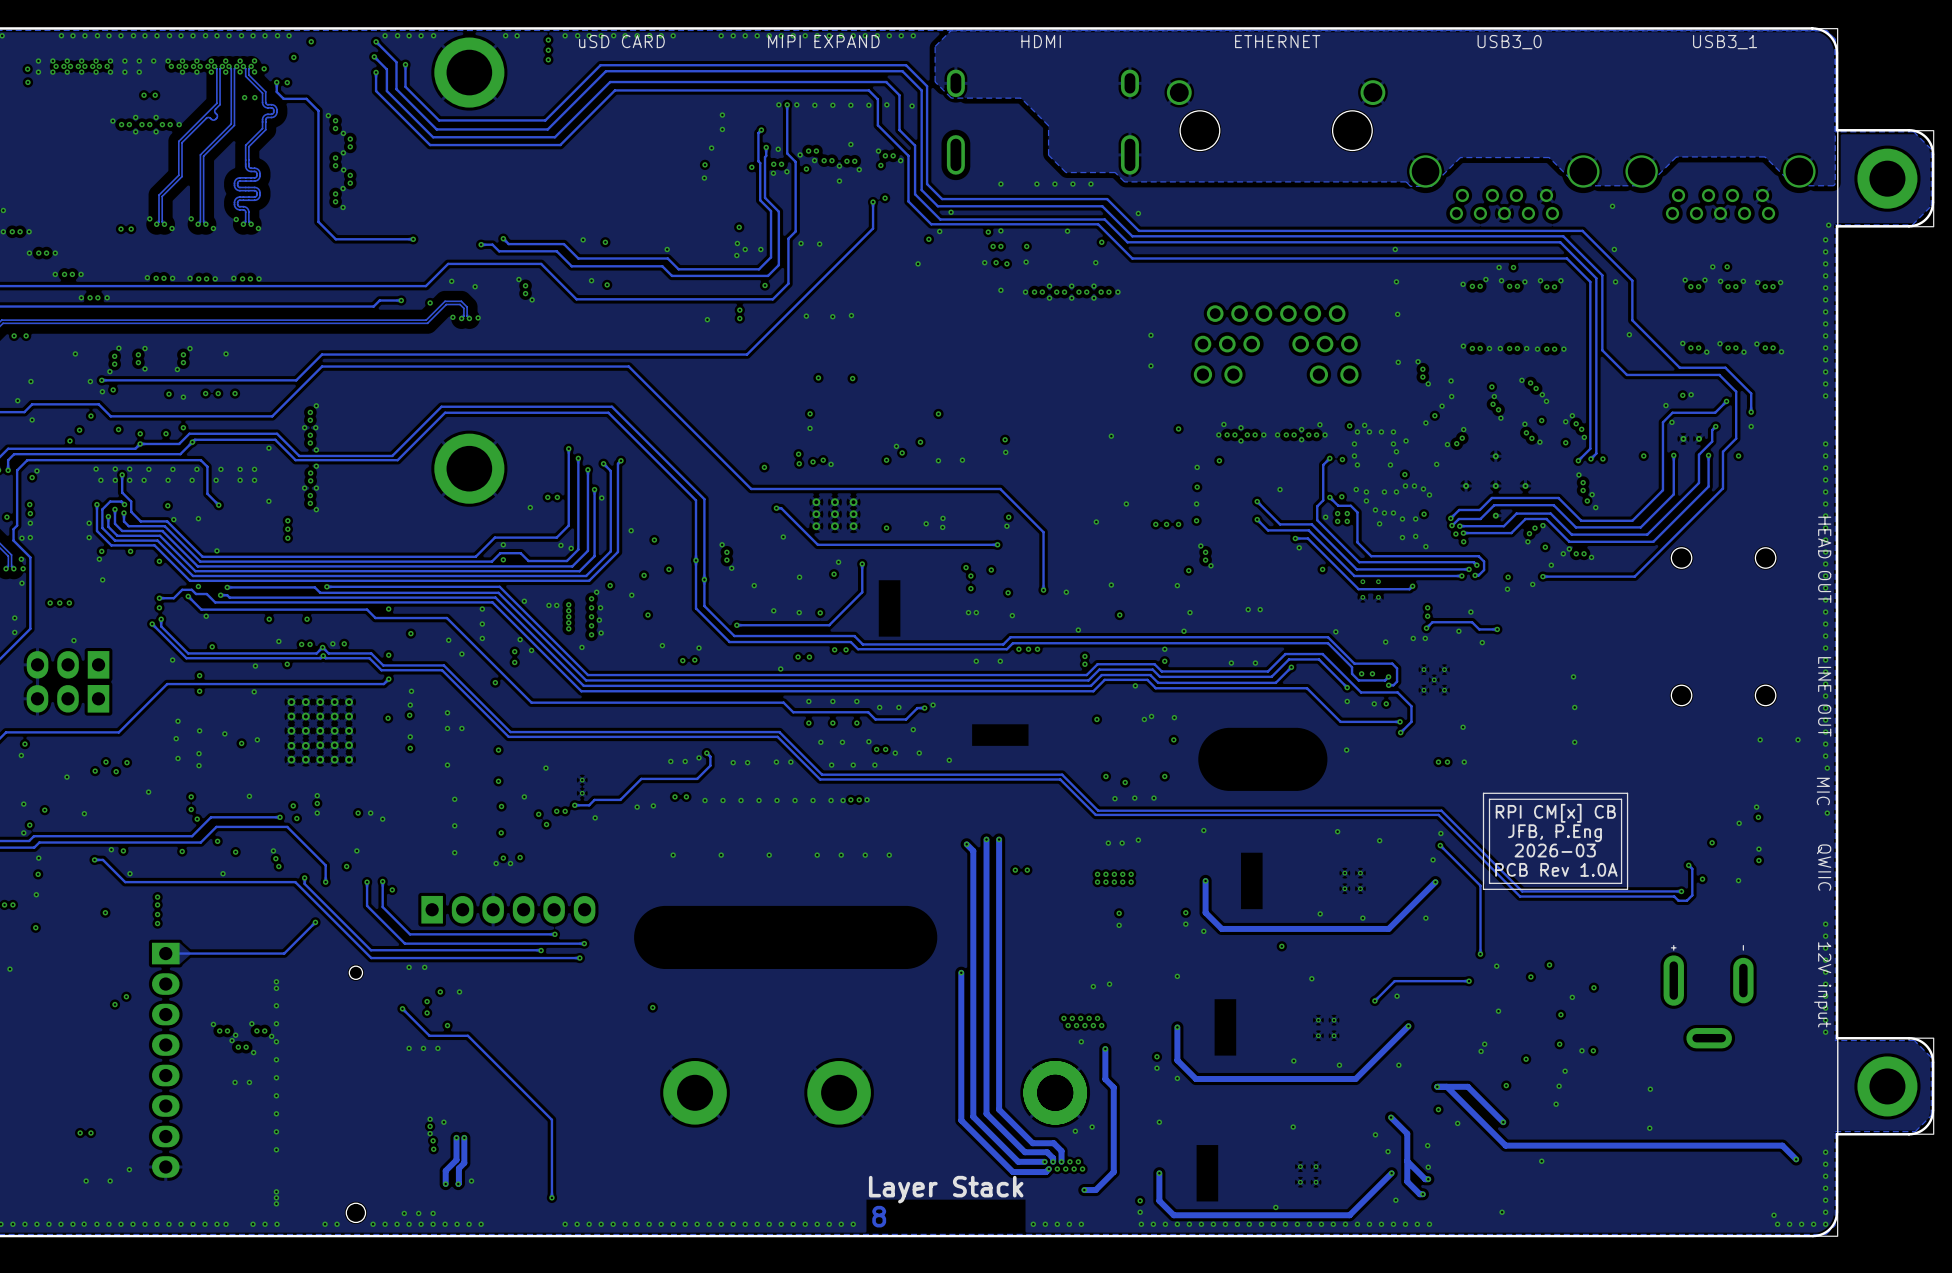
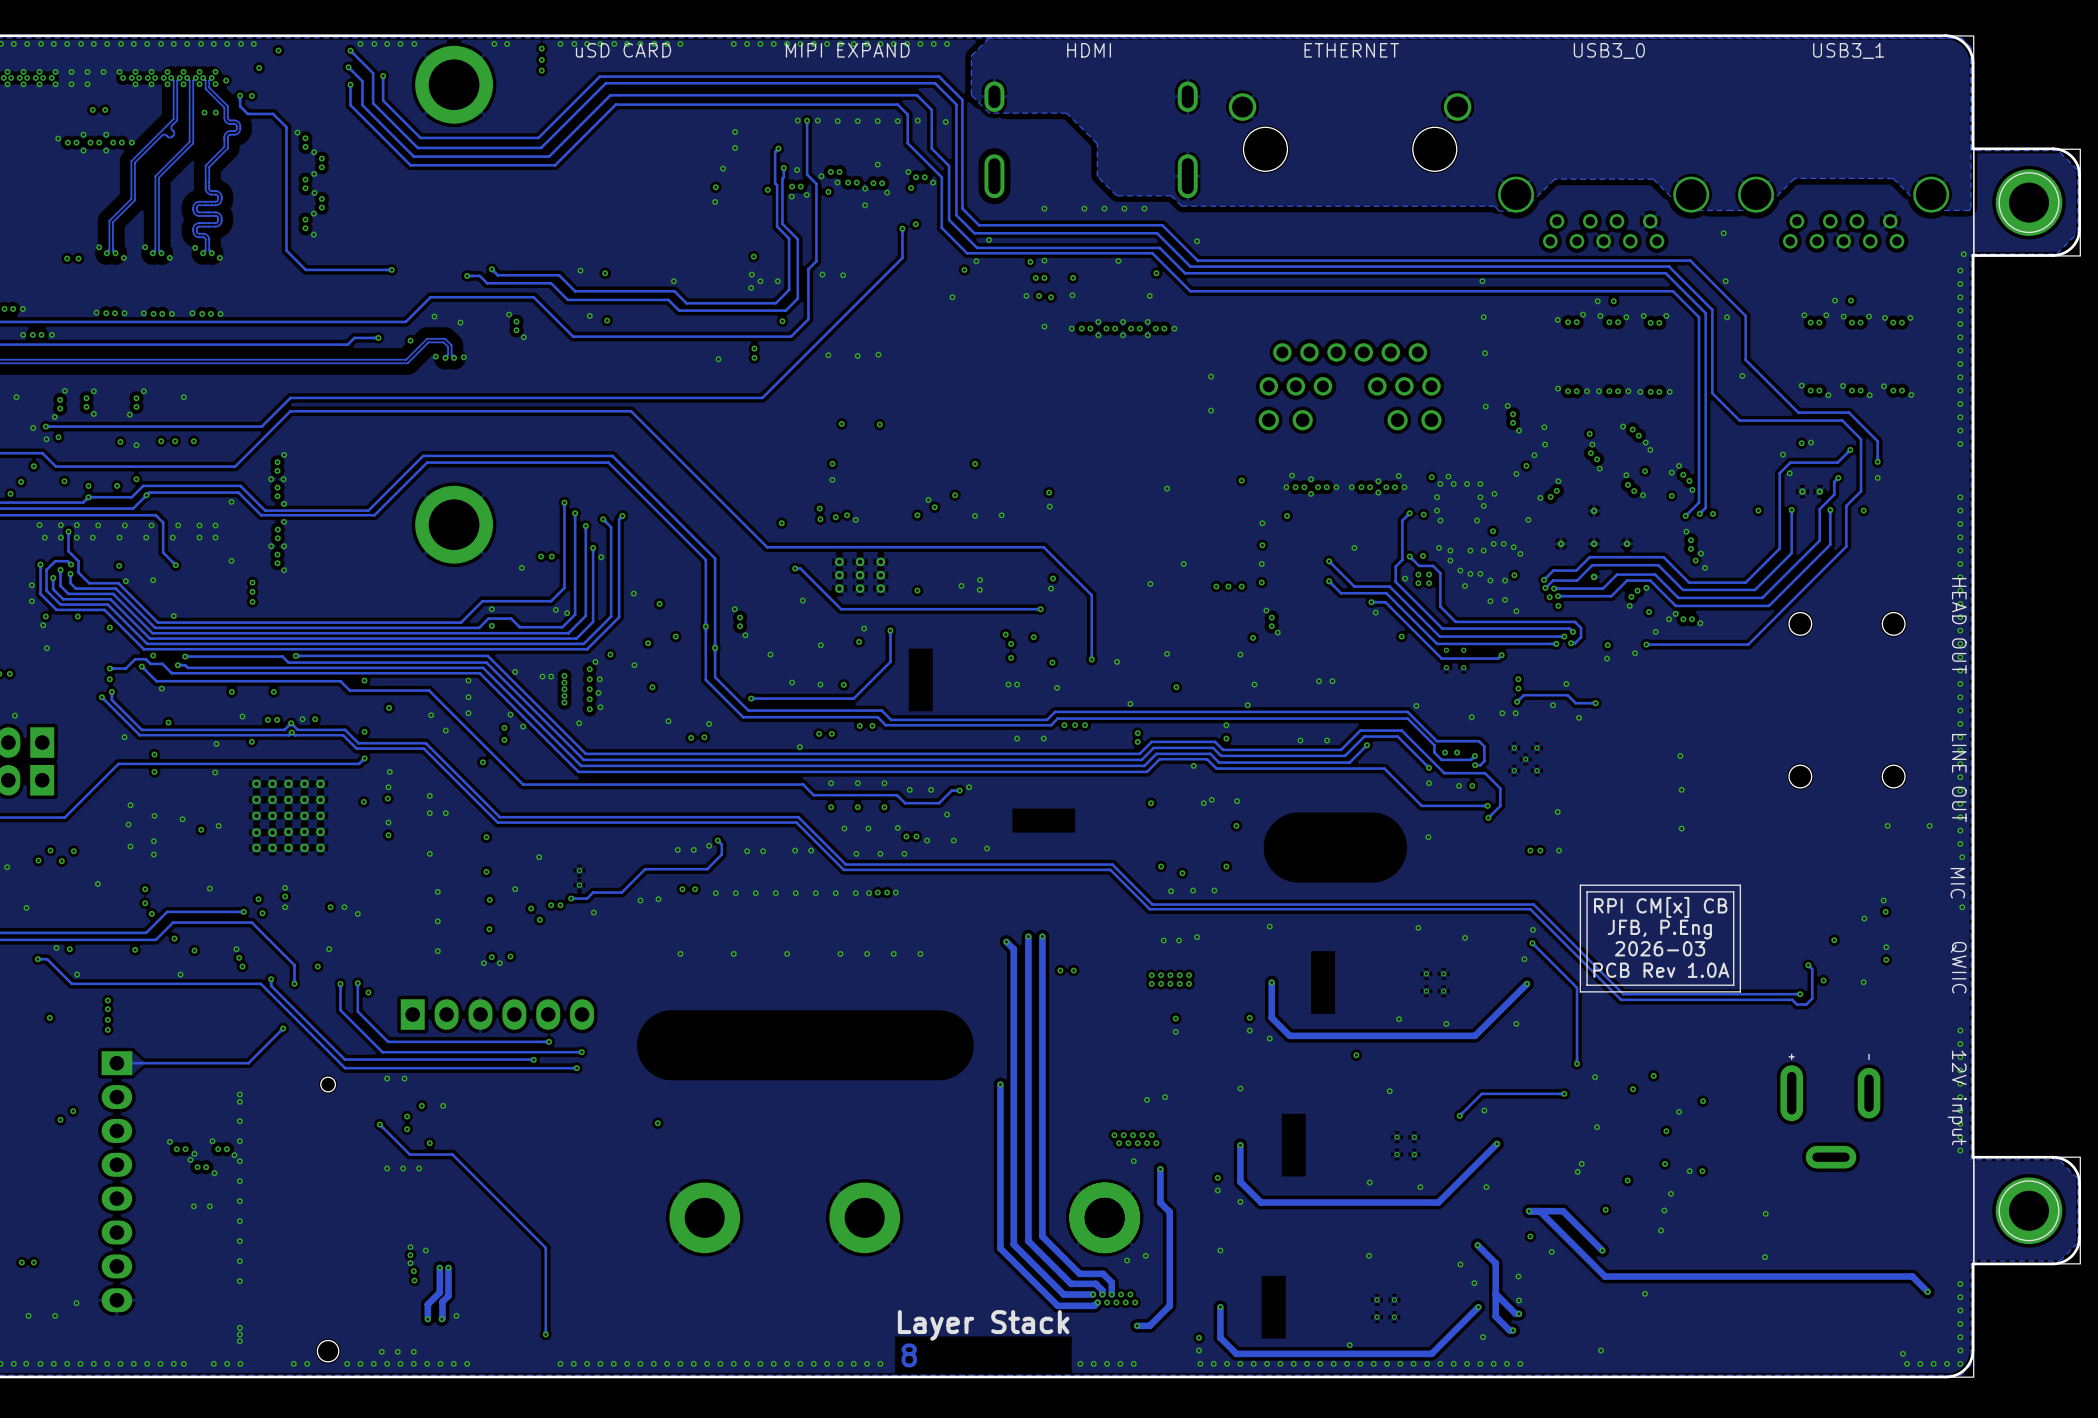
drawing: none -> [1998, 172, 2060, 234]
drawing: none -> [1998, 1180, 2060, 1242]

